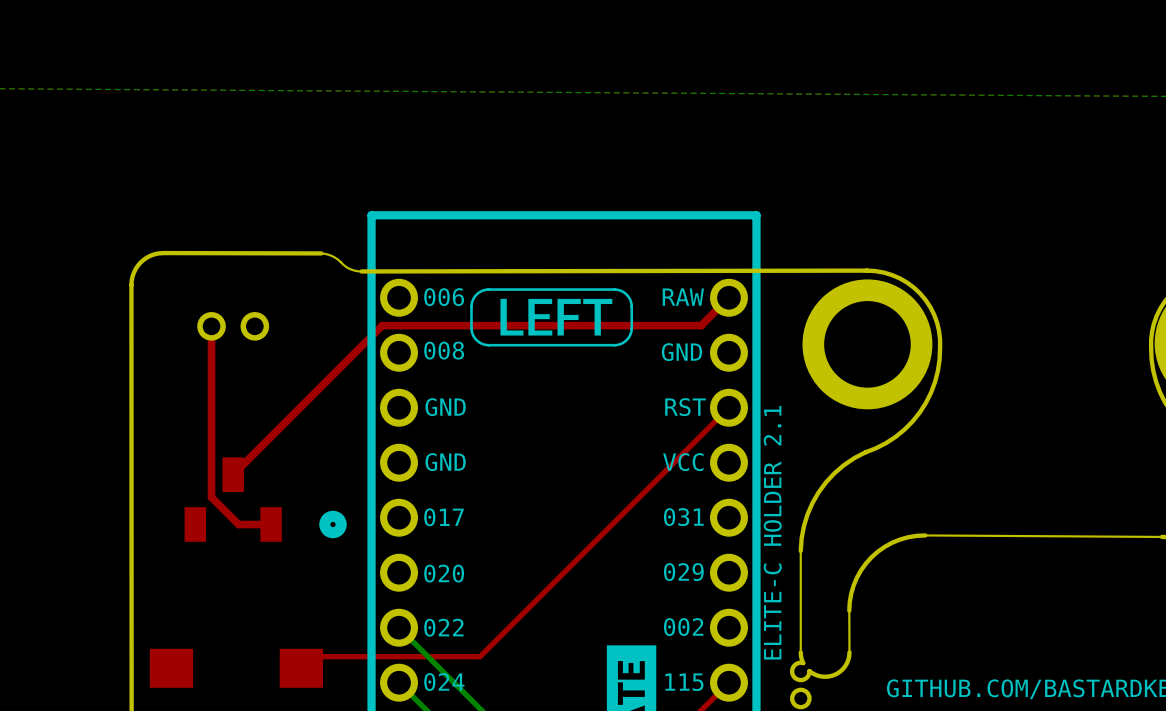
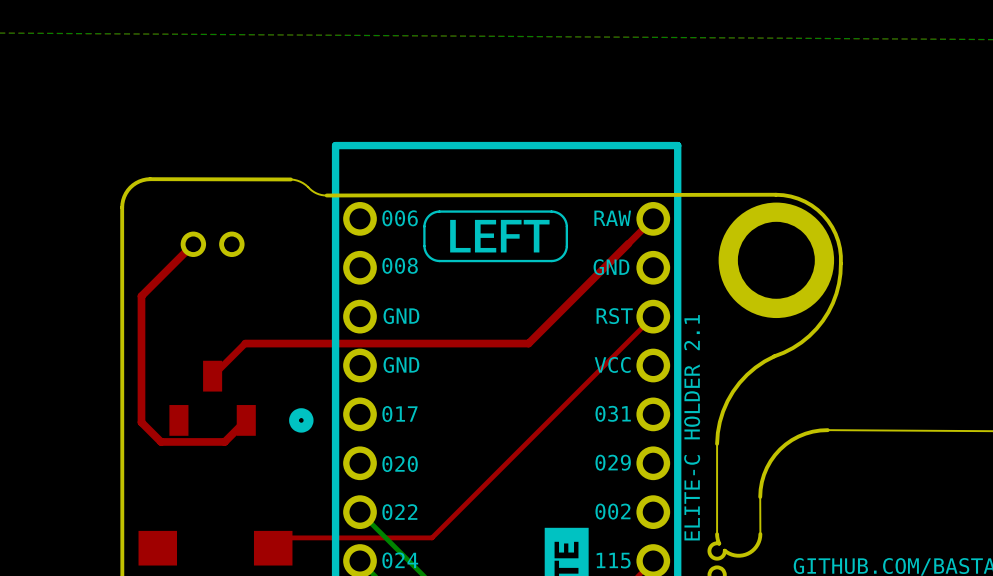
top track: (701, 325) (382, 325) (269, 438) -> (628, 243) (528, 343) (245, 343)
top track: (211, 326) (211, 497) (238, 524) (271, 524) -> (193, 244) (141, 296) (141, 422) (161, 441) (224, 441) (246, 420)

